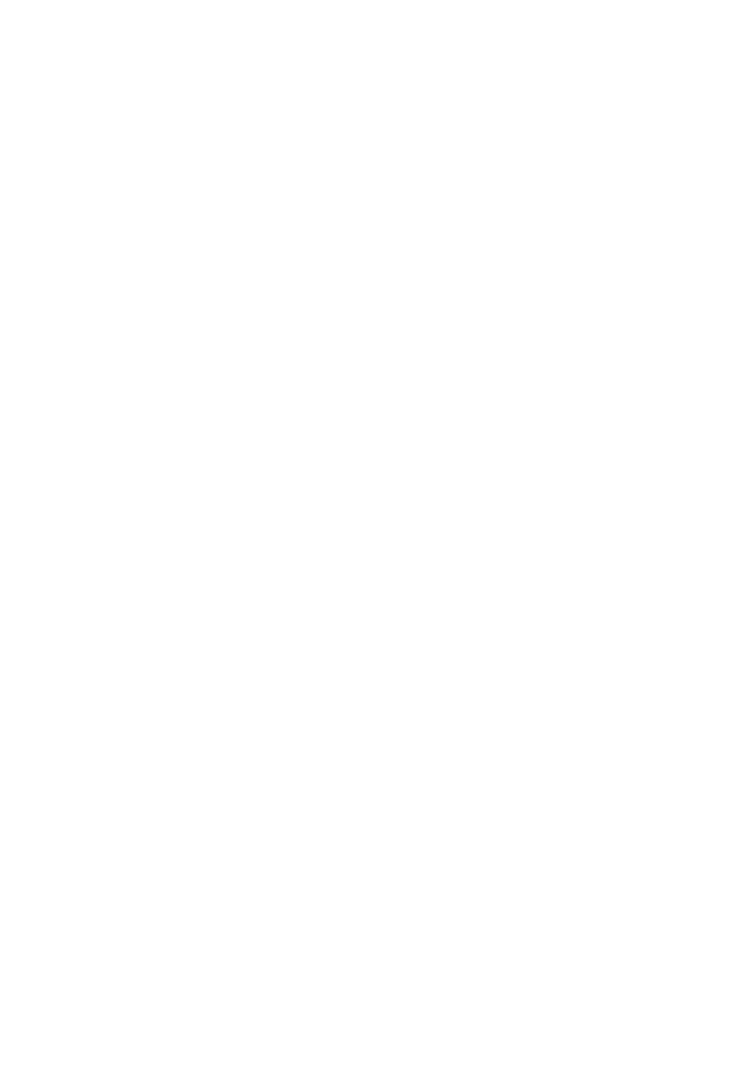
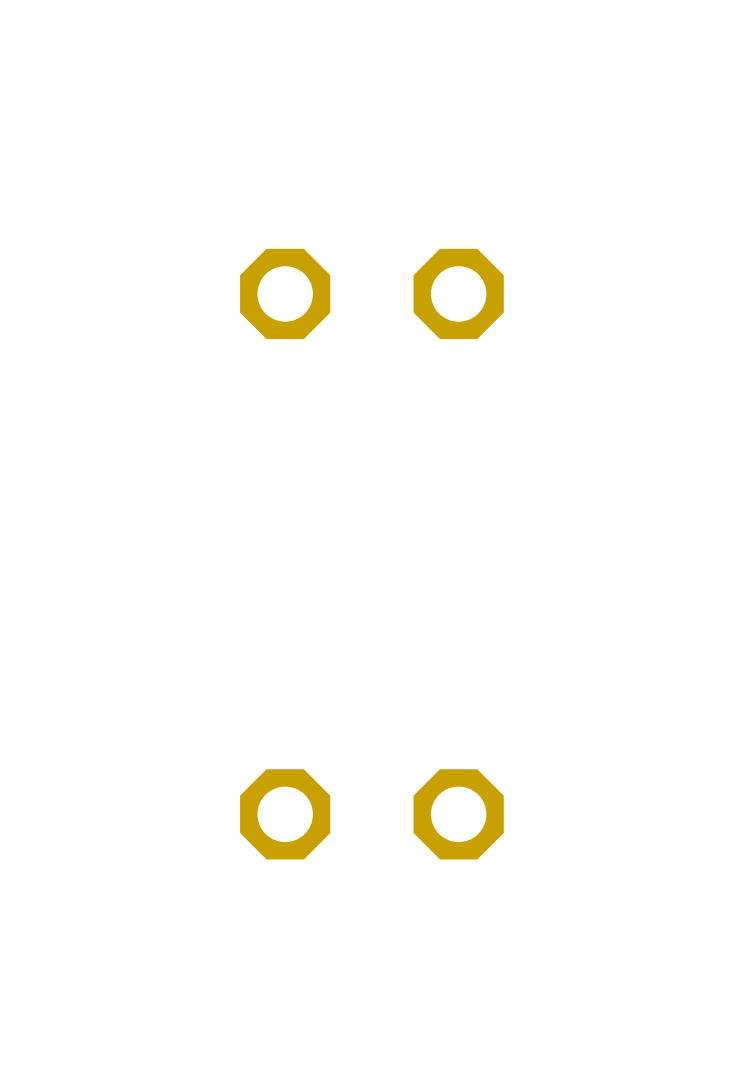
part: none -> (371, 293)
part: none -> (371, 814)

